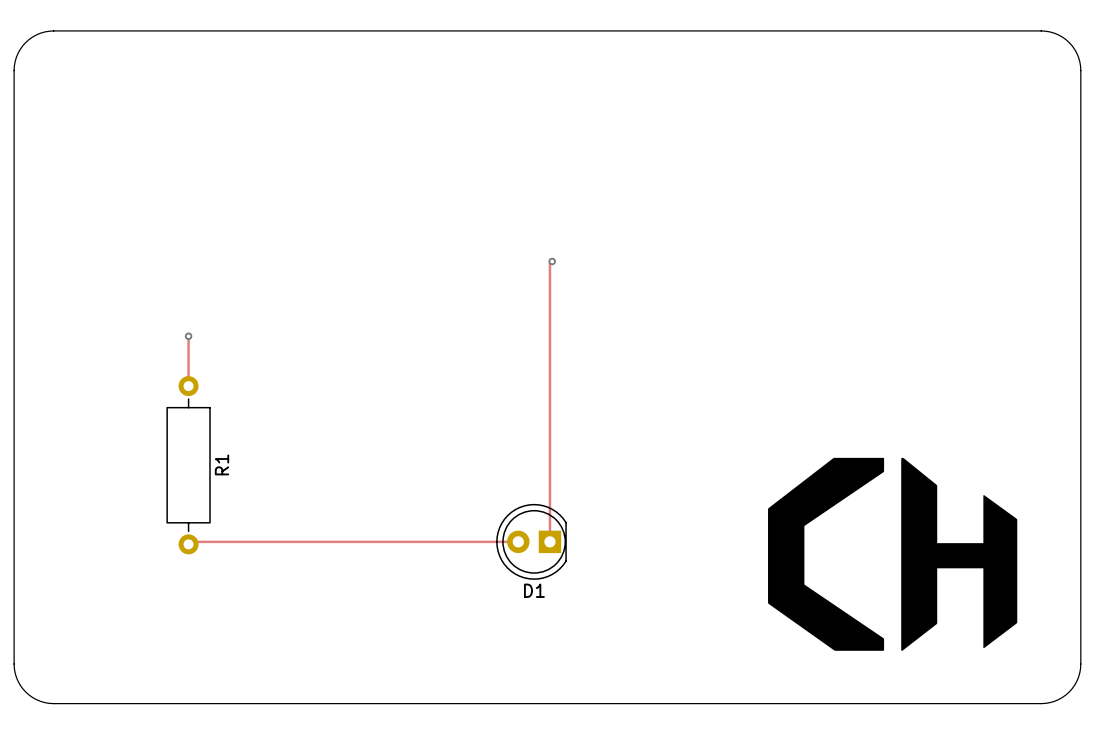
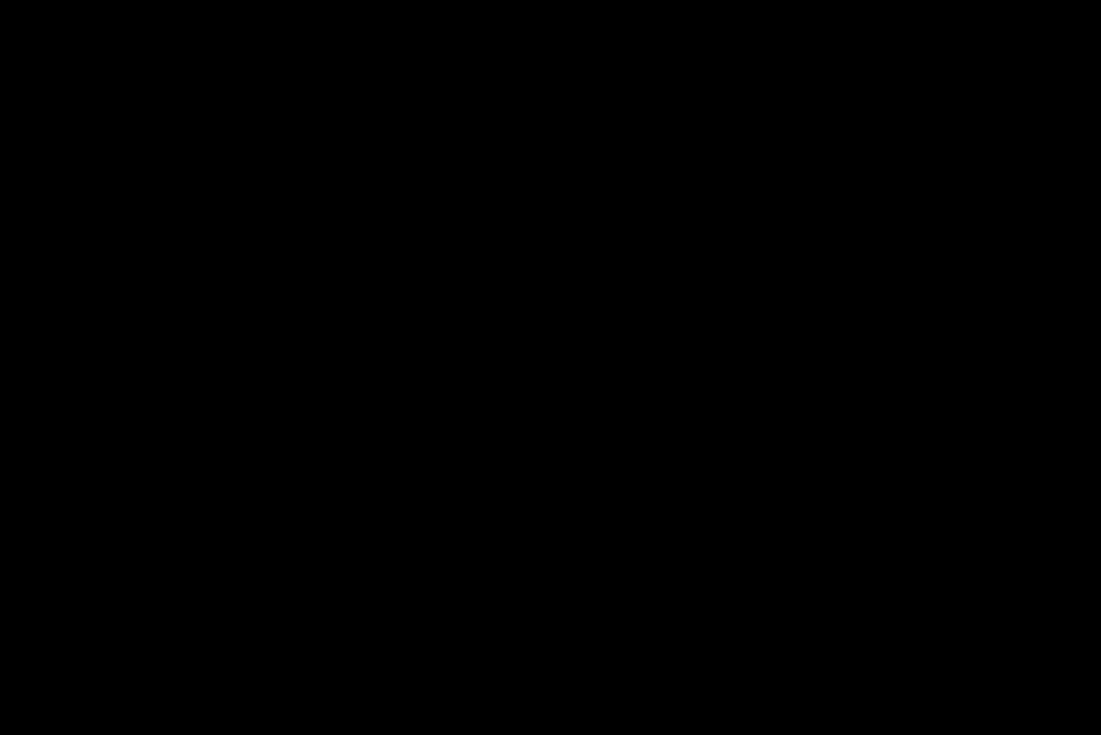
board edge: (53, 30) (1041, 30) (1062, 37) (1076, 53) (1080, 70) (1080, 663) (1074, 685) (1058, 699) (1041, 703) (53, 703) (32, 697) (20, 685) (14, 663) (14, 70) (16, 57) (25, 42) (40, 33) (53, 30) -> none
track: (552, 261) (549, 263) (549, 541) (552, 539) -> none
via: (552, 261) -> none
track: (188, 336) (188, 386) -> none
via: (188, 336) -> none
drawing: [768, 457, 1018, 651] -> none
R1: (188, 465) -> none
track: (518, 541) (191, 541) (188, 544) -> none
D1: (531, 541) -> none

